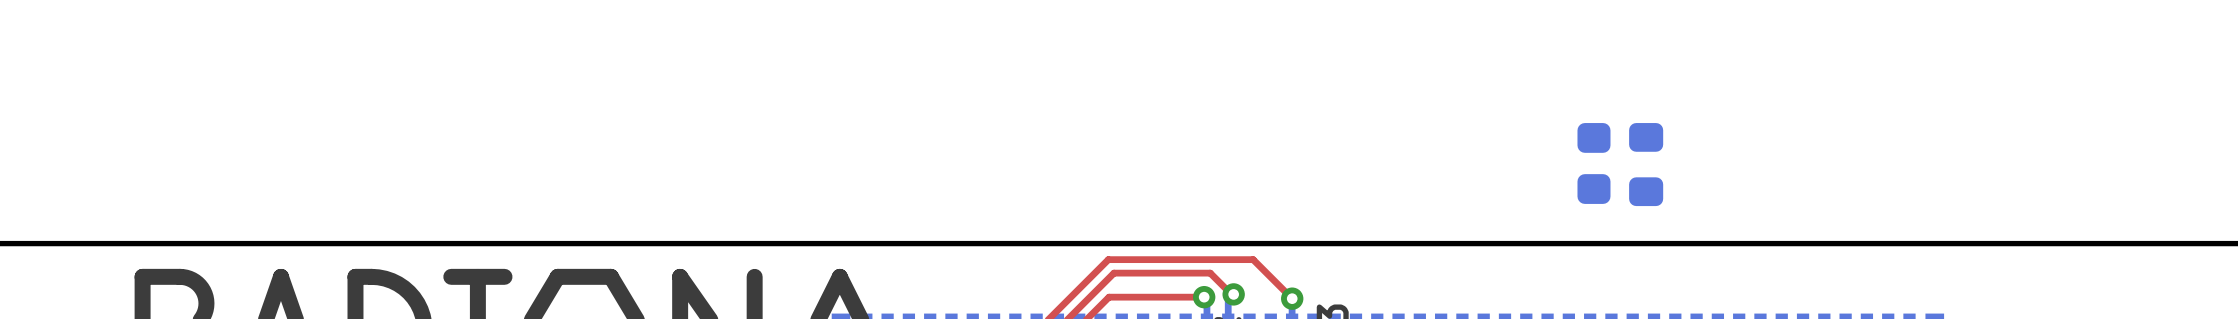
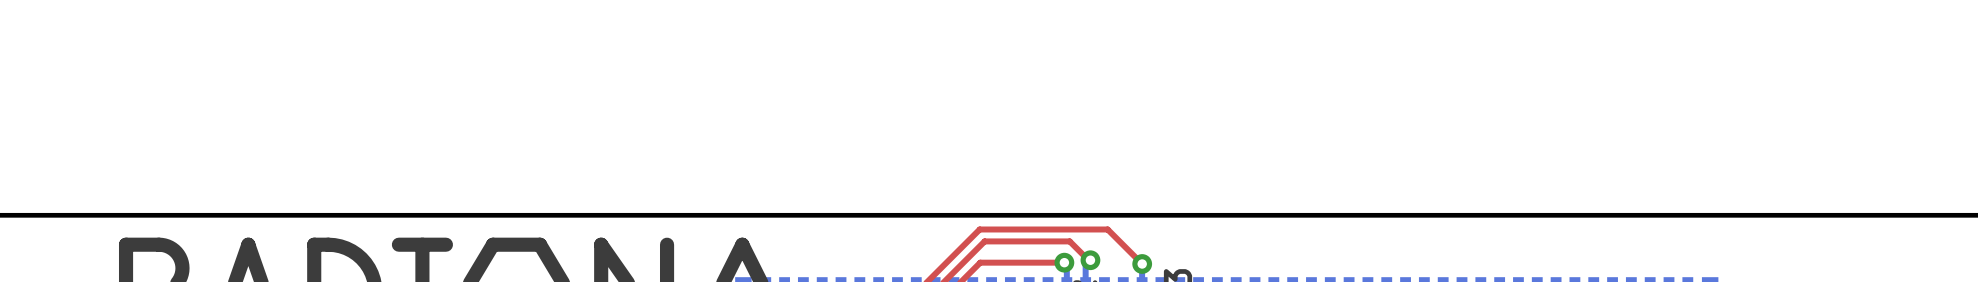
part: (1593, 163) -> none
part: (1646, 164) -> none

